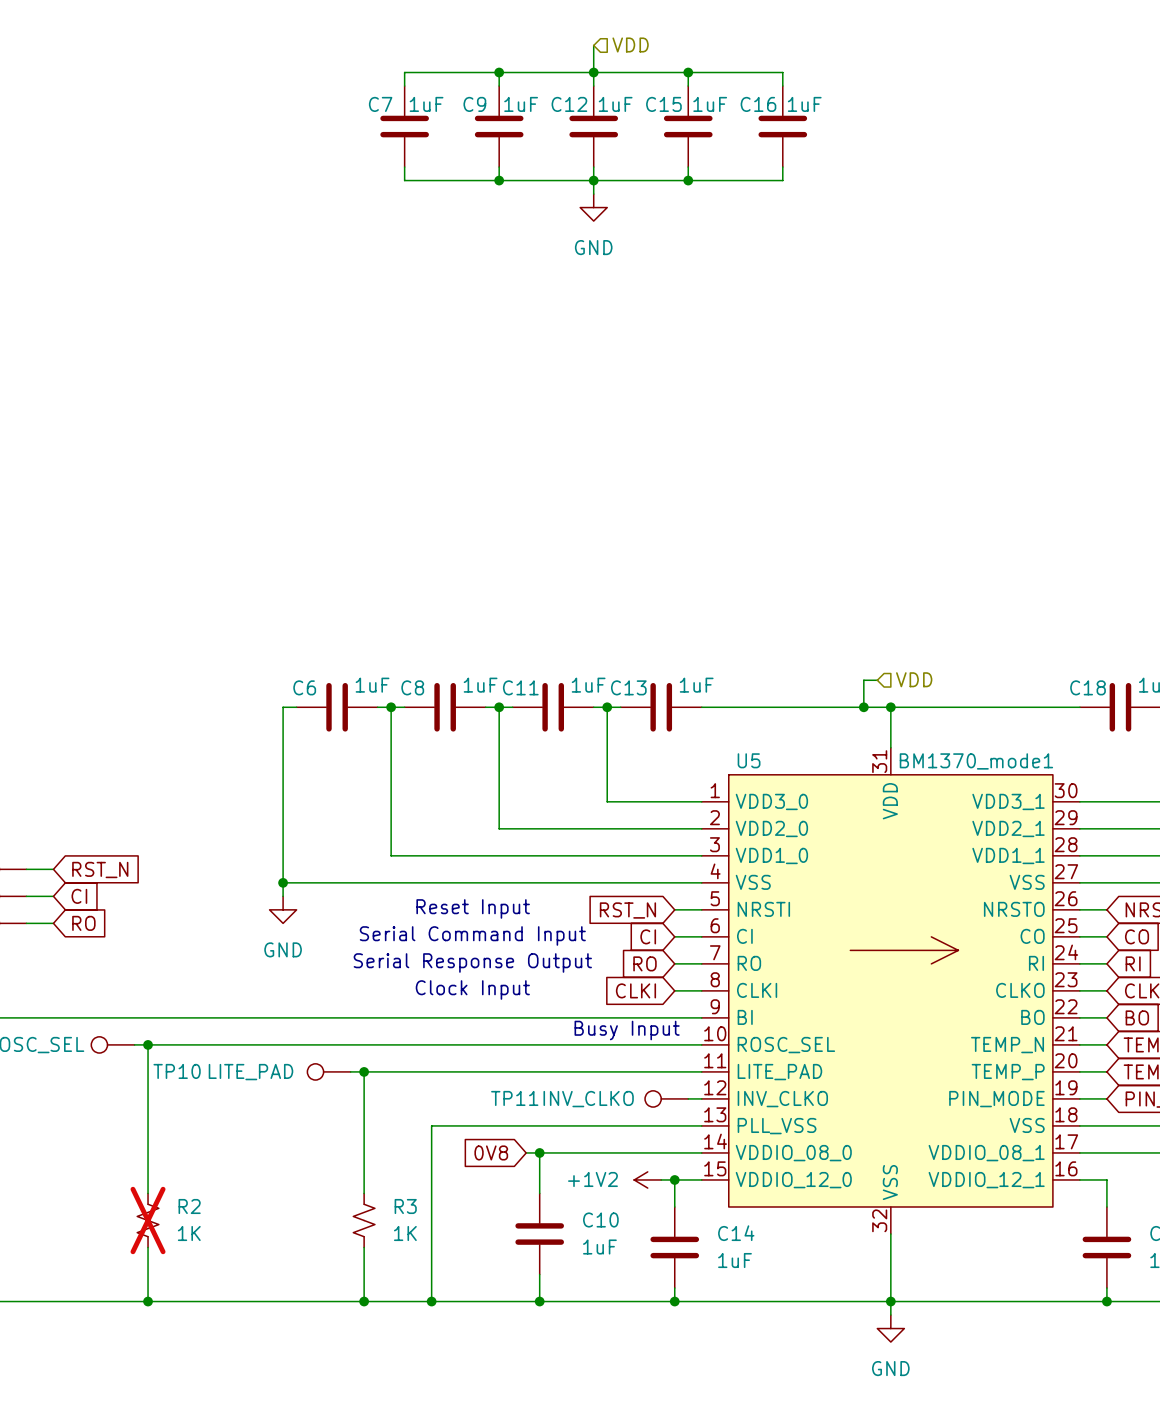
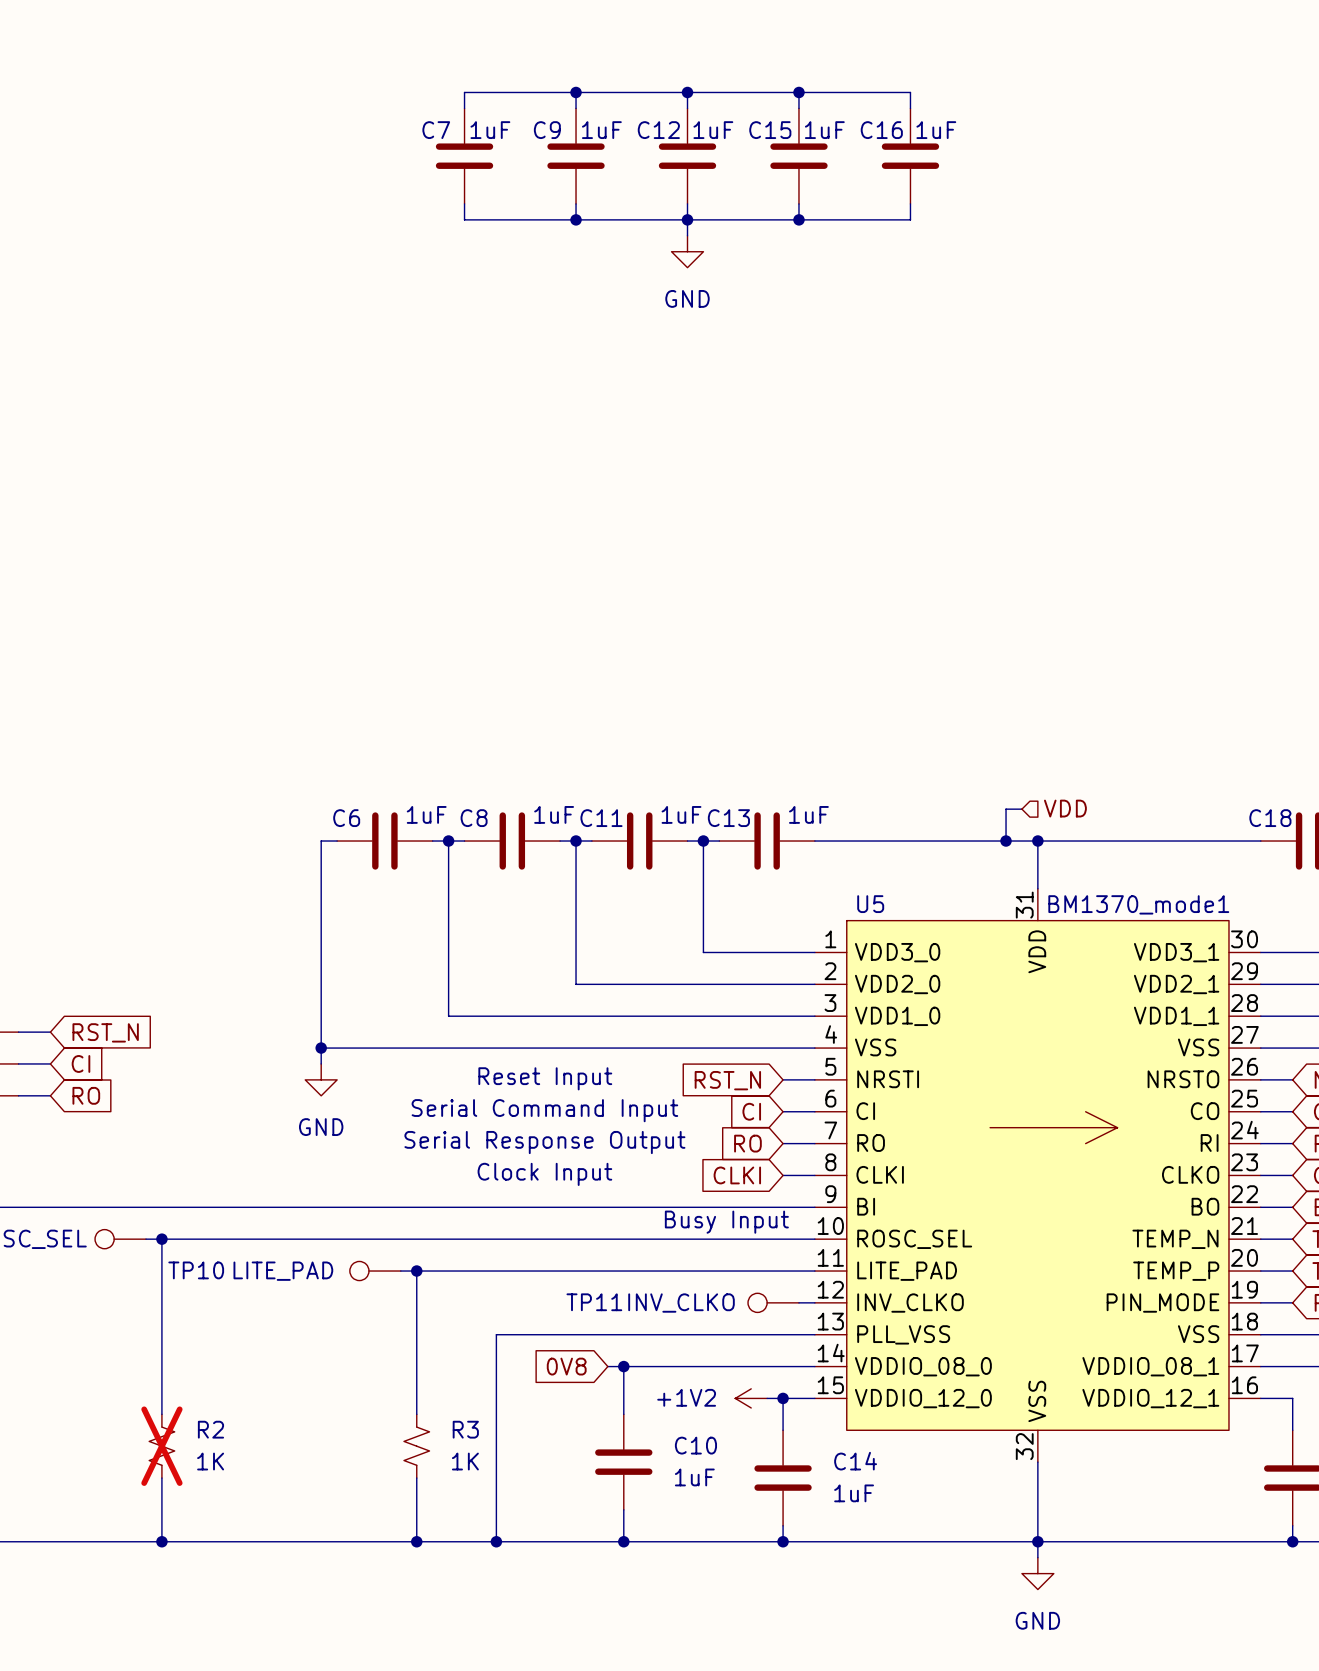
hierarchical label: VDD (630, 44) -> none
wire: (593, 45) (593, 72) -> none

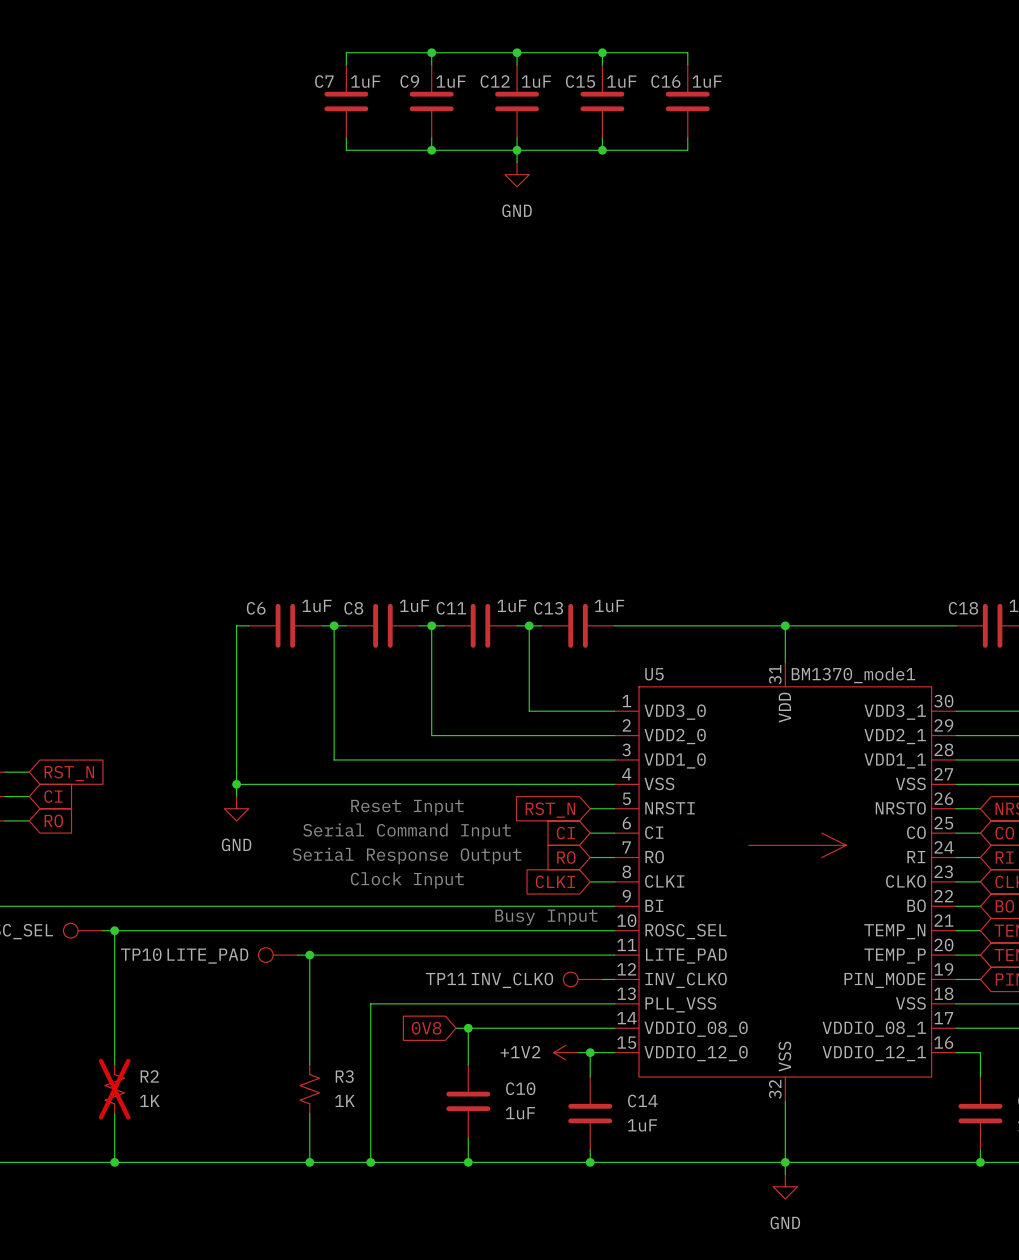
hierarchical label: VDD (1065, 808) -> none
wire: (1021, 809) (1006, 809) (1006, 841) -> none
junction: (1006, 841) -> none

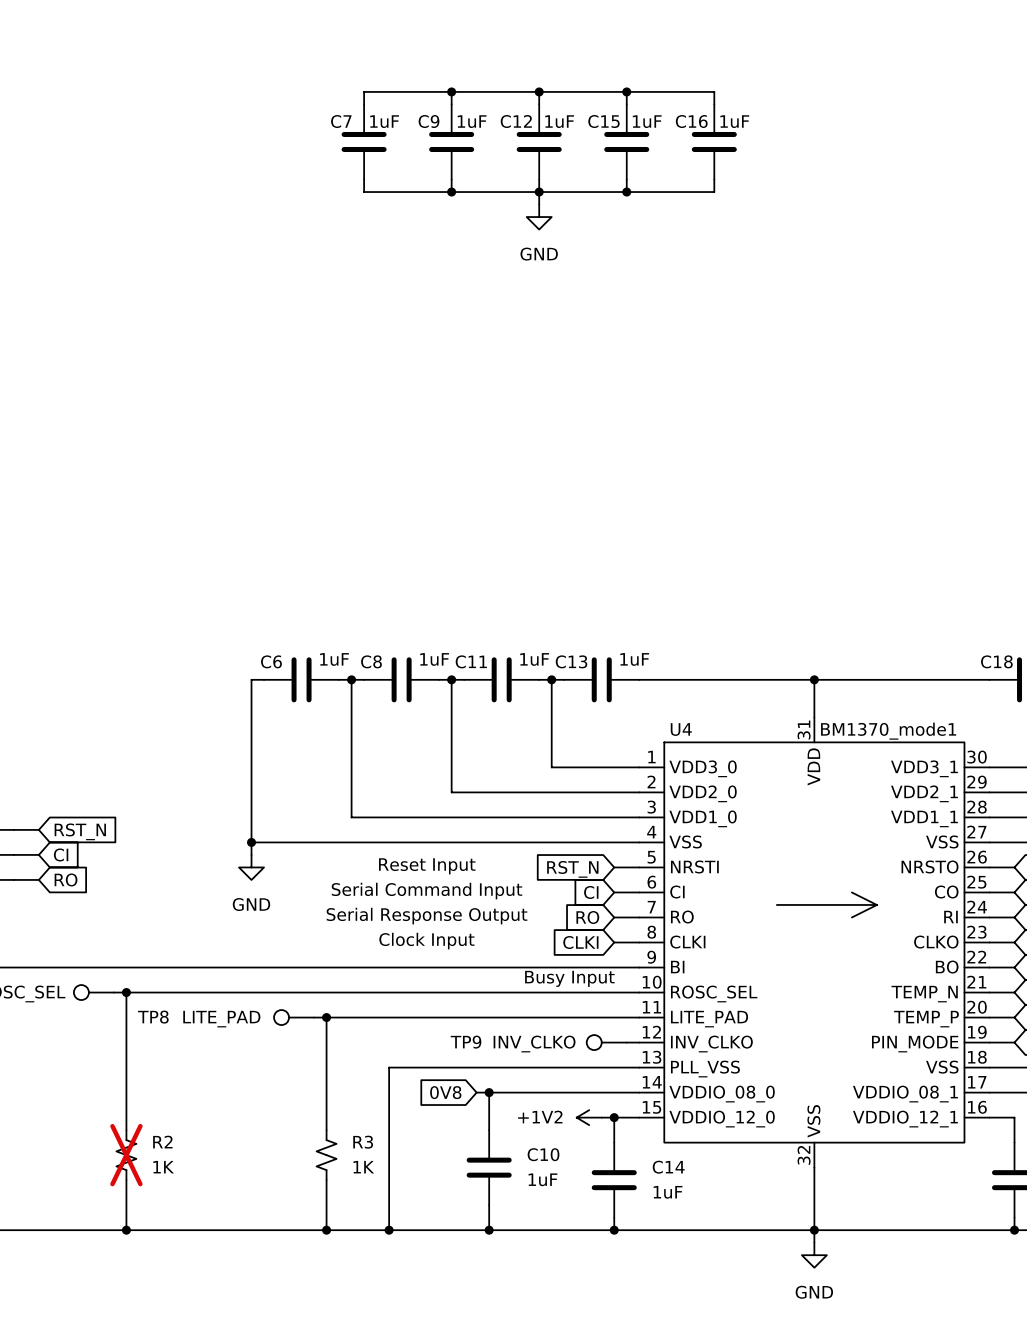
U5 name: U5 (654, 674) -> U4 (681, 729)
TP10 name: TP10 (141, 954) -> TP8 (153, 1017)
TP11 name: TP11 (446, 979) -> TP9 (466, 1042)

